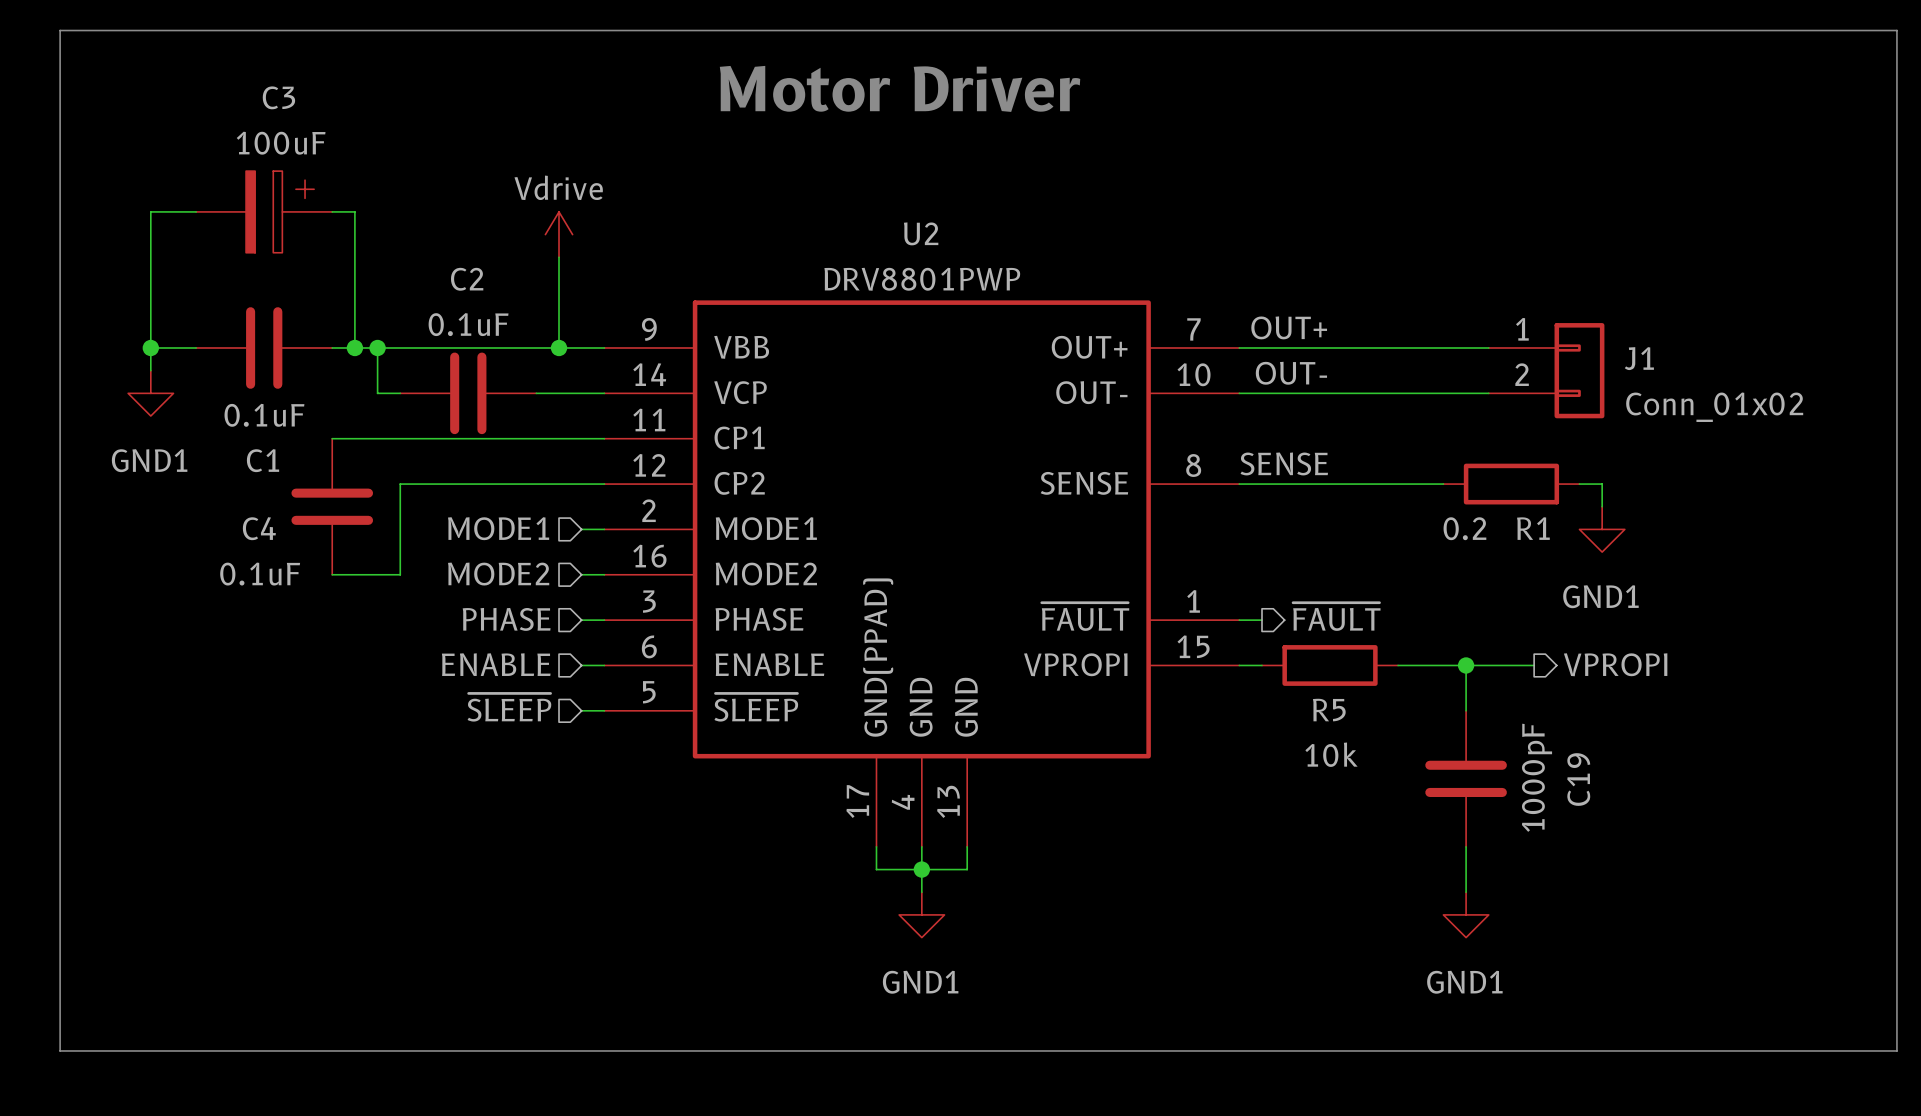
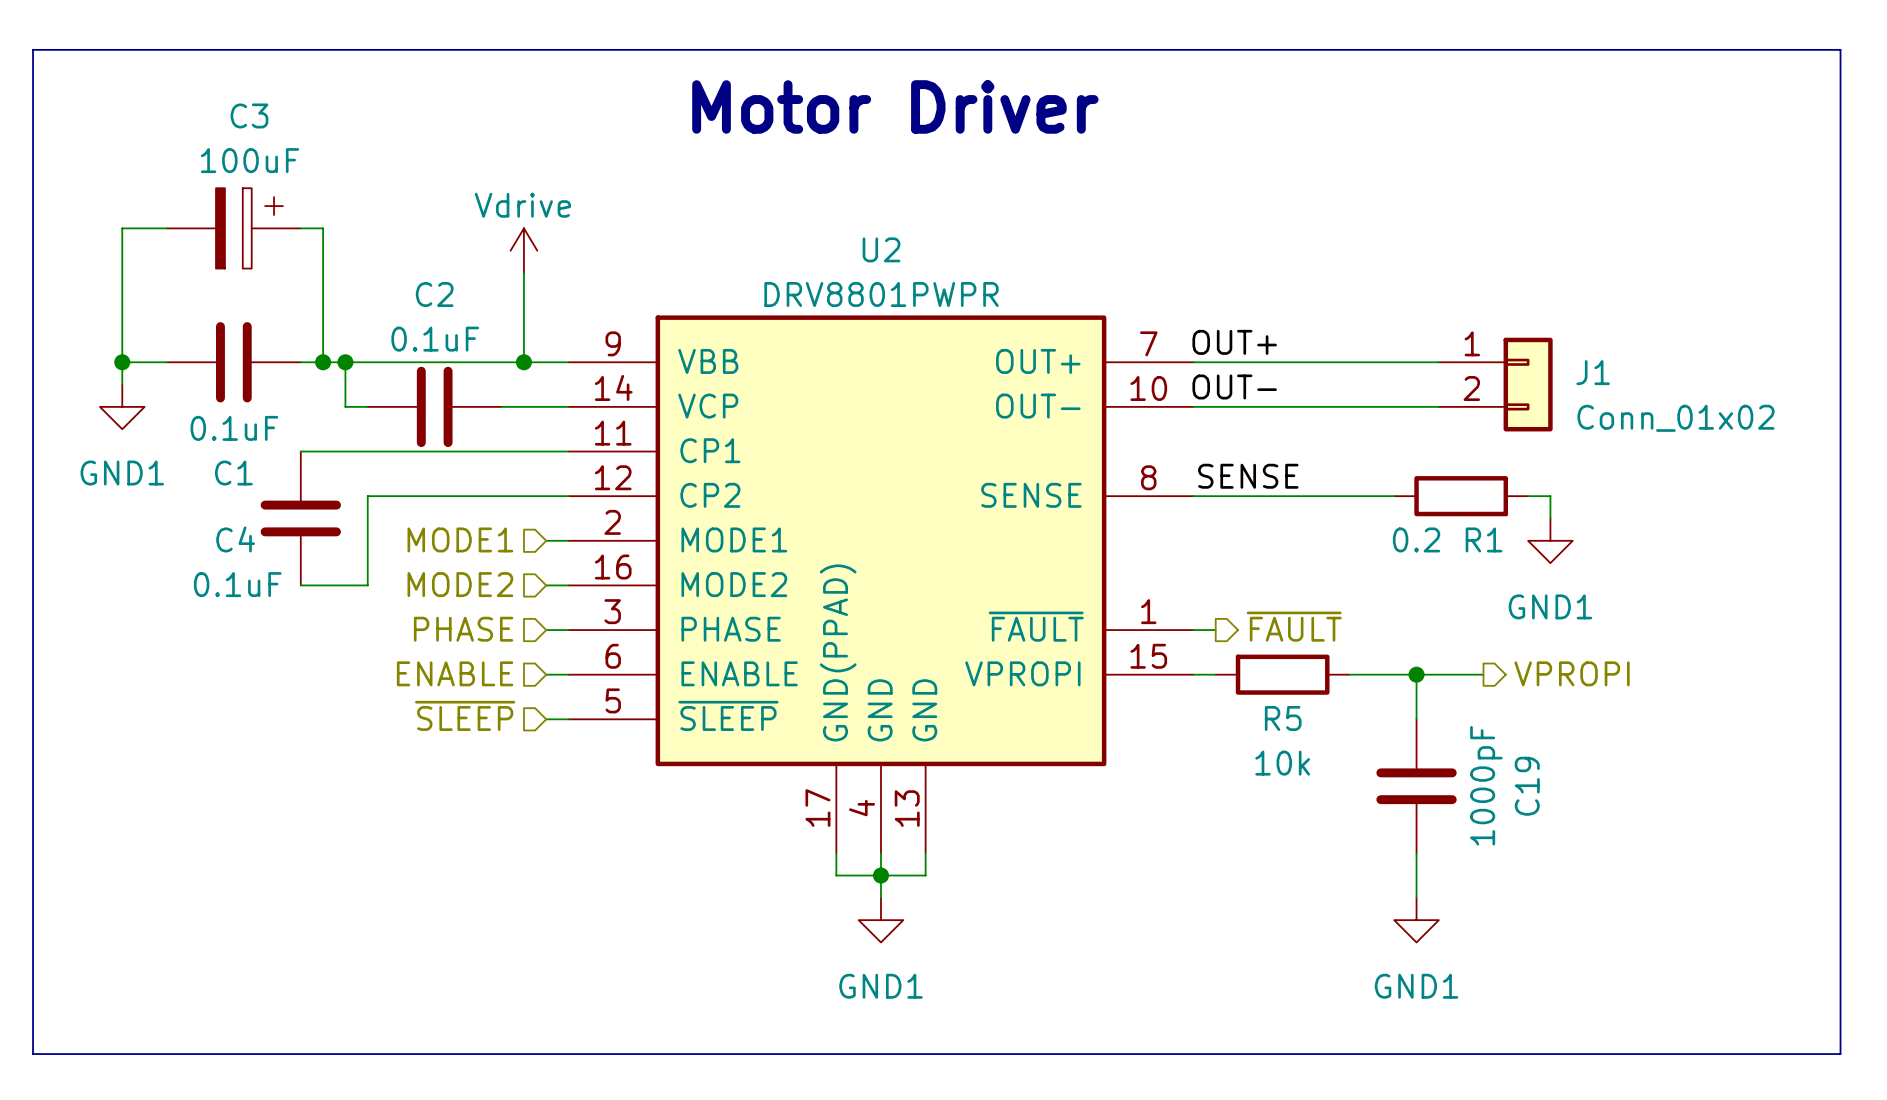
U2 value: DRV8801PWP (922, 279) -> DRV8801PWPR (881, 294)

